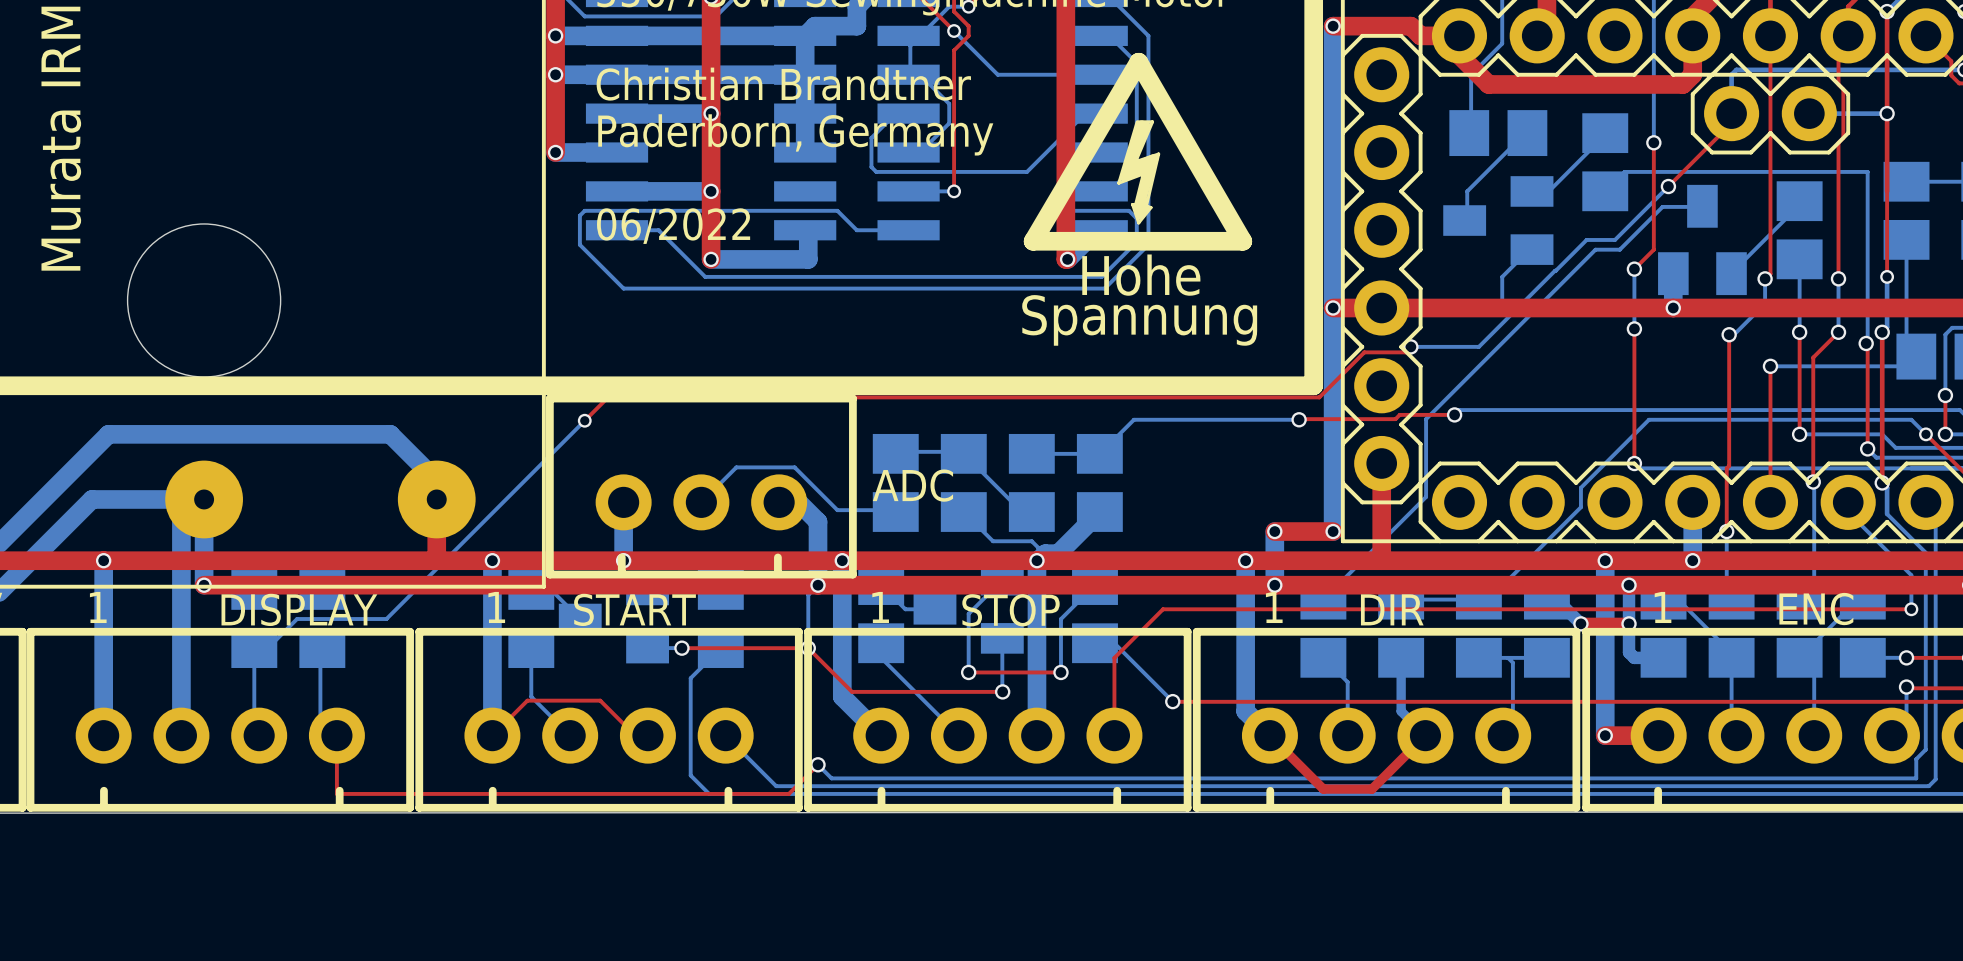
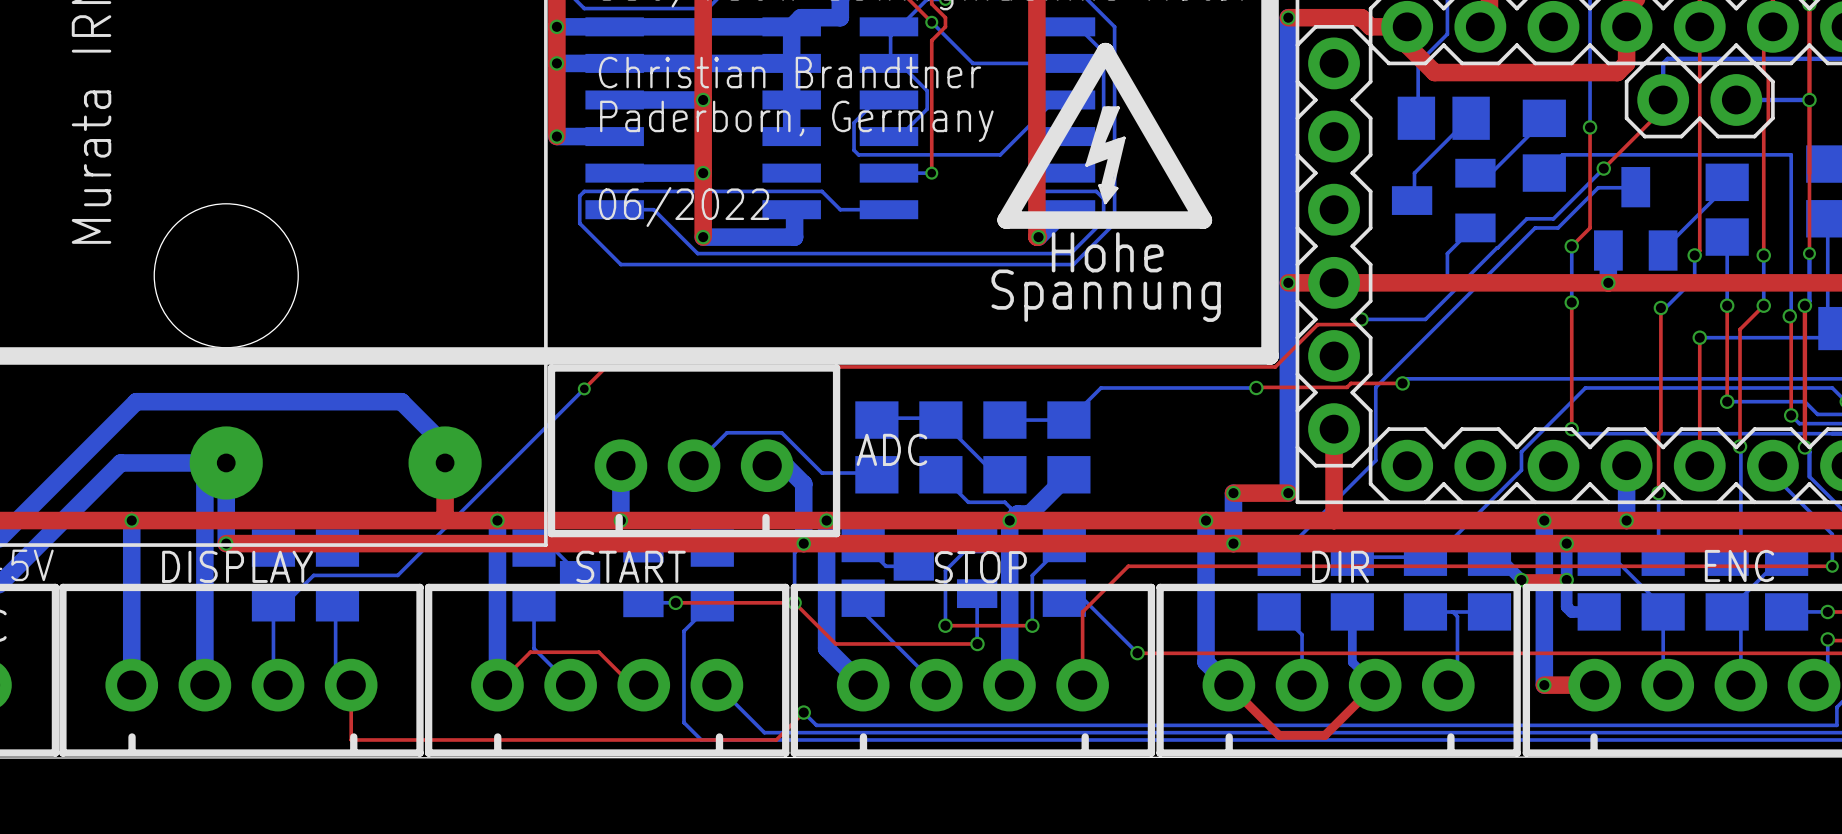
text: 1 (98, 607) -> none
text: 1 (496, 607) -> none
text: 1 (880, 607) -> none
text: 1 (1274, 607) -> none
text: 1 (1663, 607) -> none
DISPLAY name position: DISPLAY (299, 609) -> DISPLAY (237, 566)

